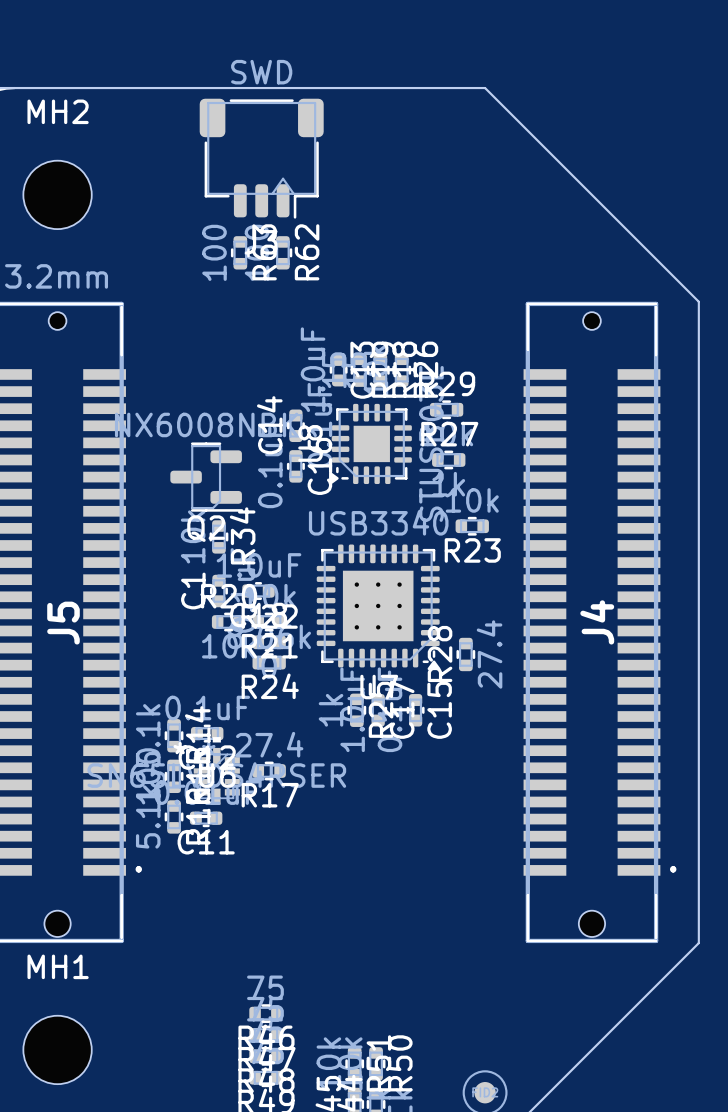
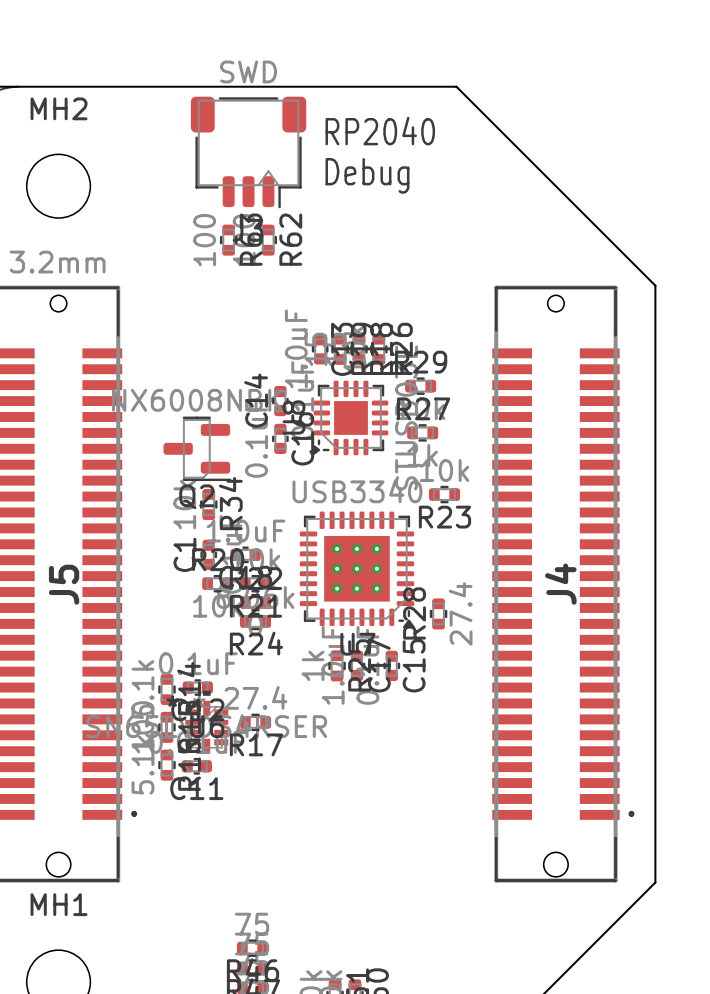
text: none -> RP2040 (380, 131)
text: none -> Debug (367, 175)

